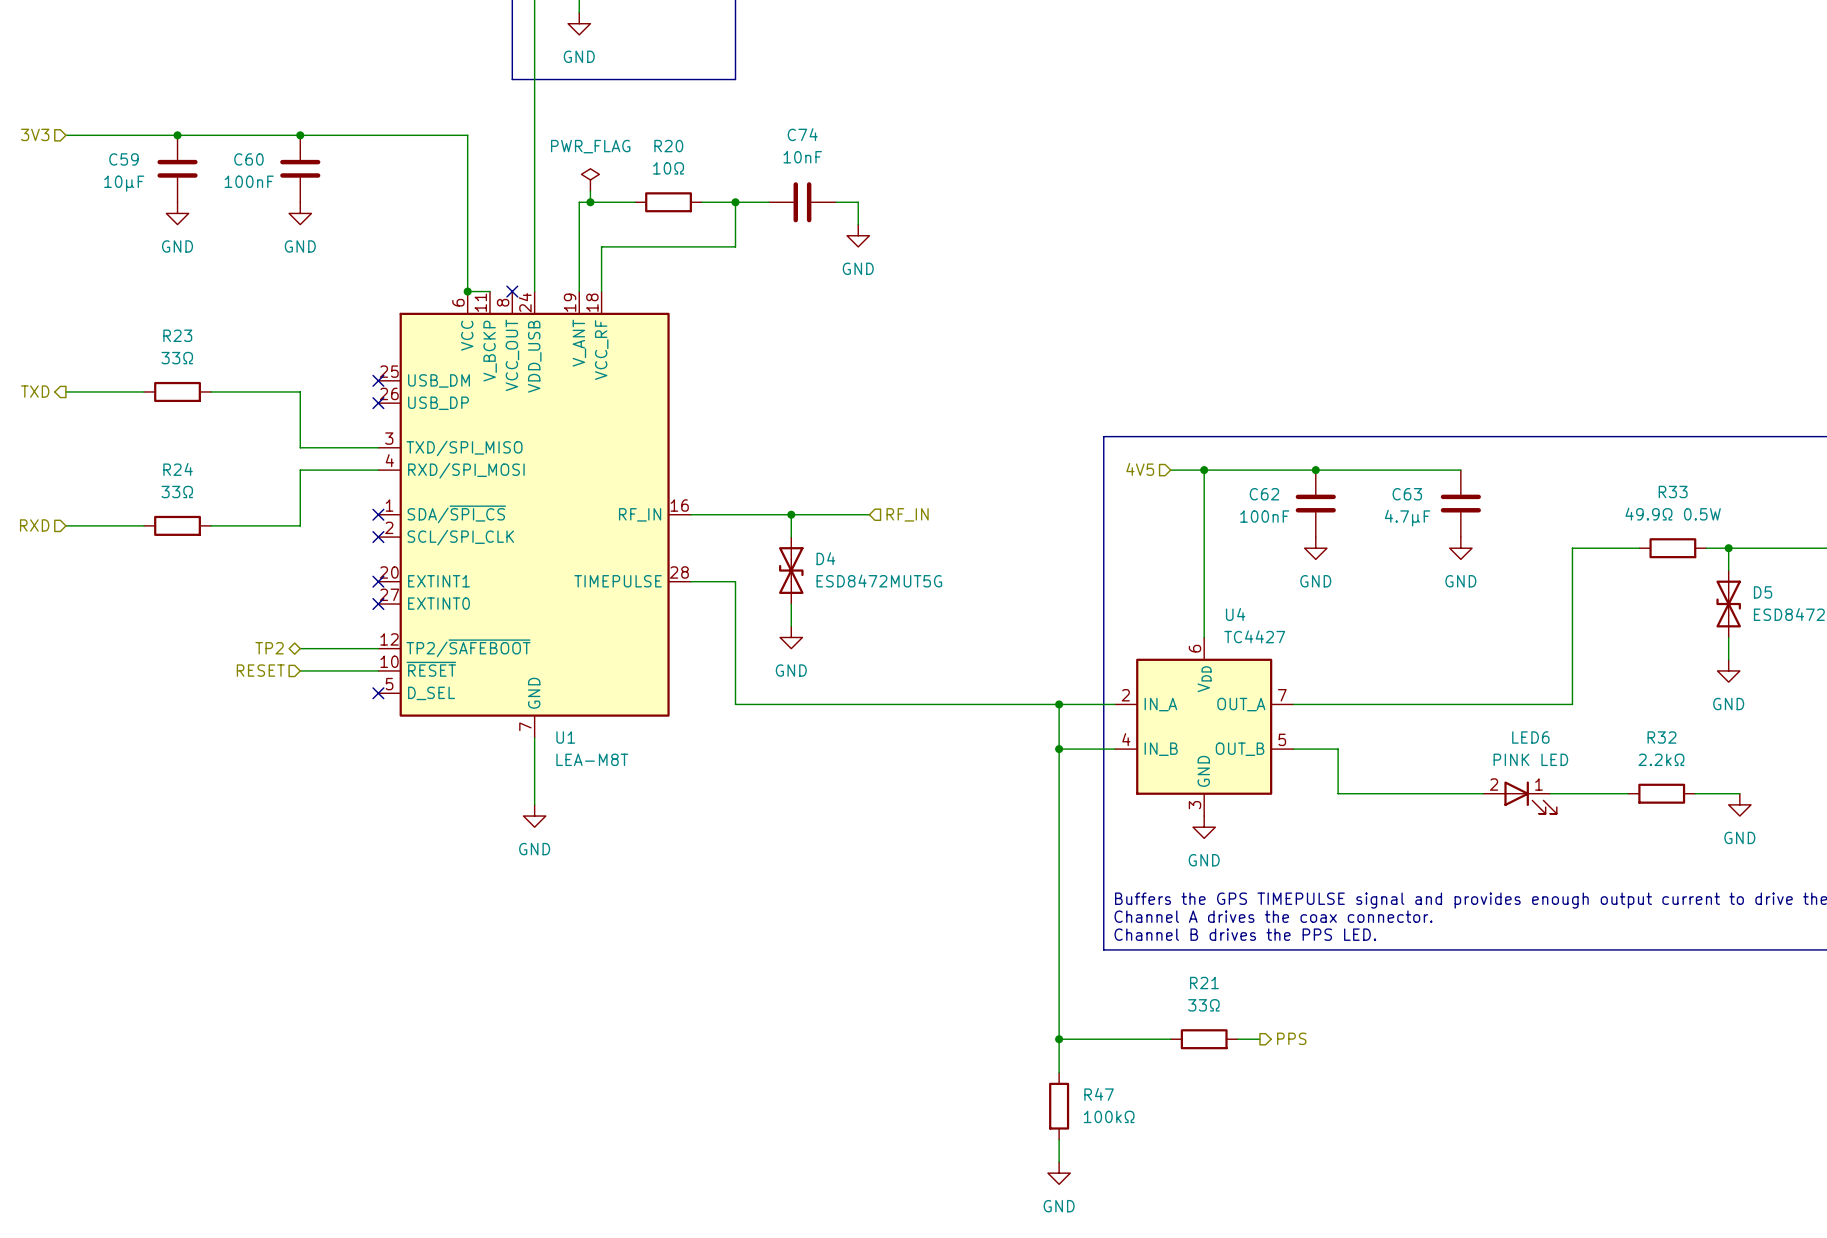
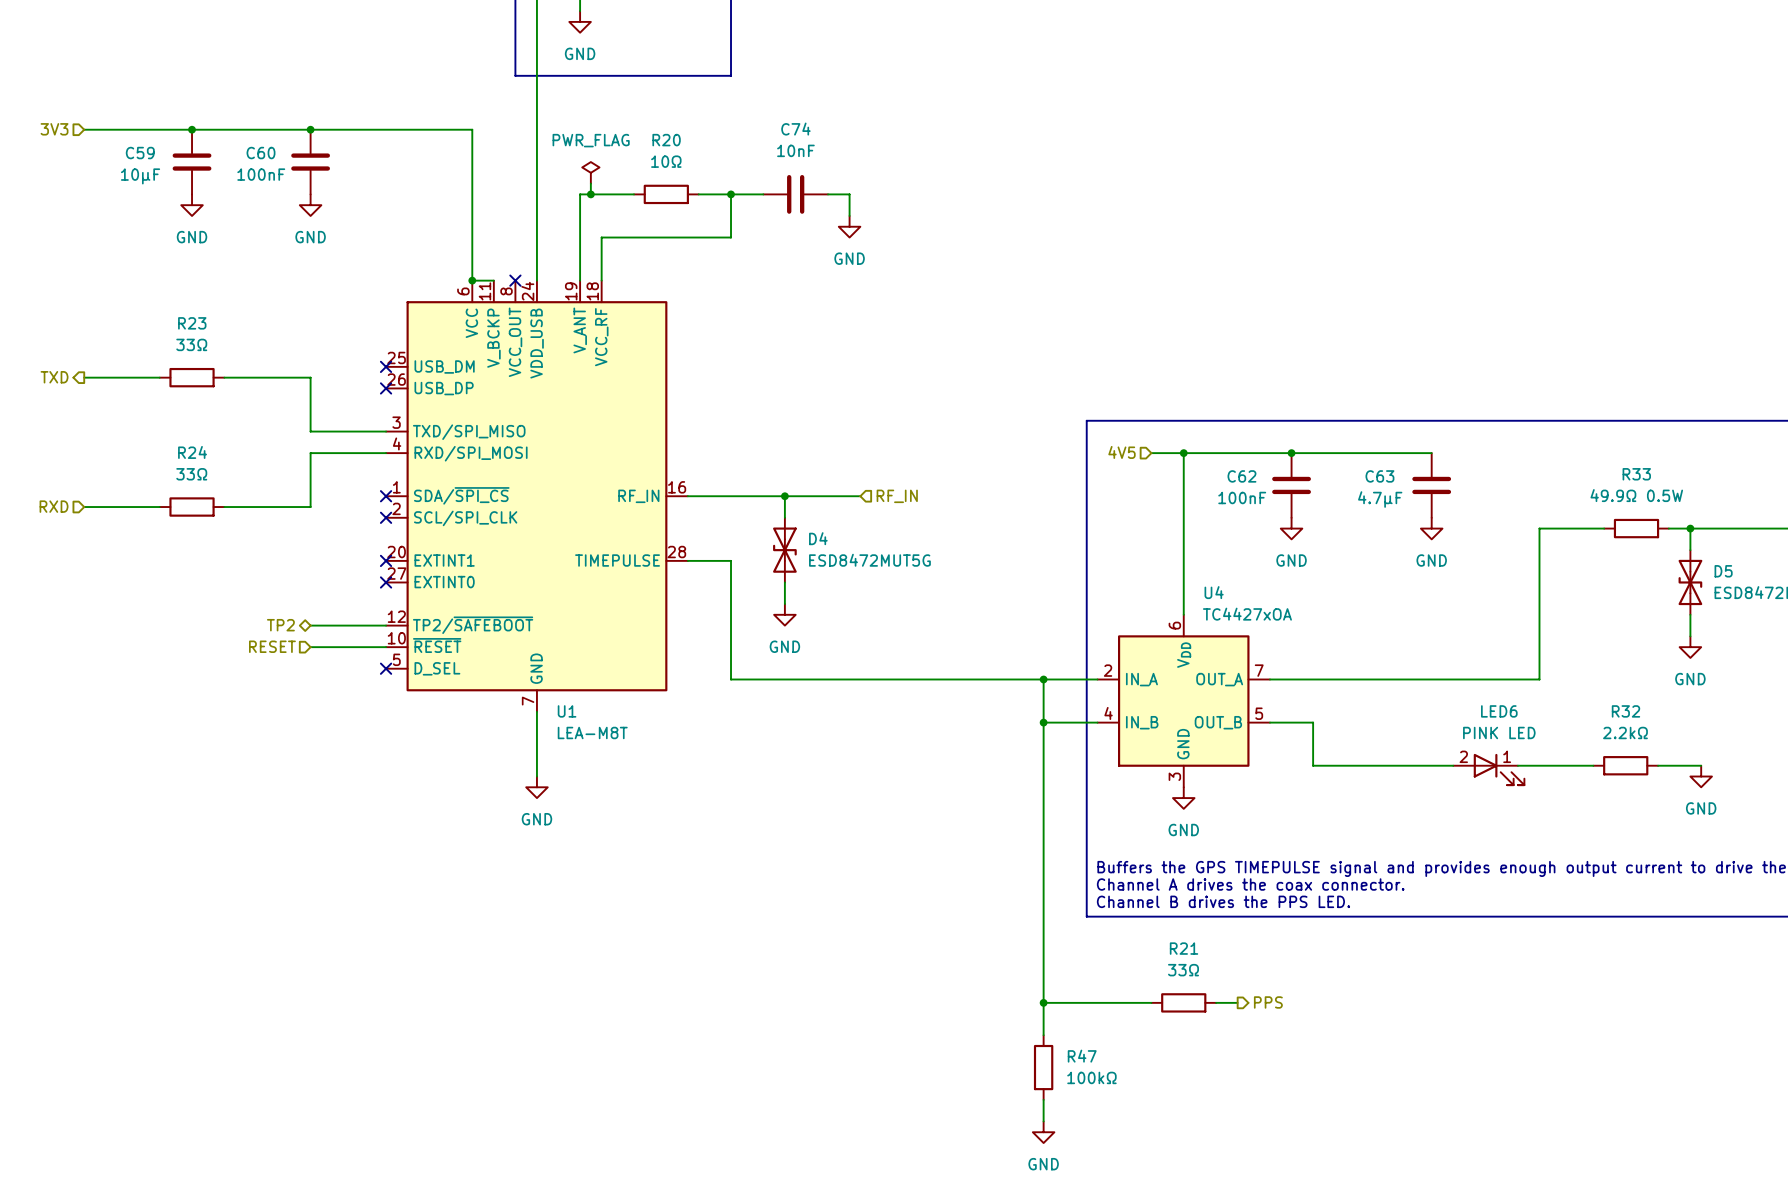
U4 value: TC4427 (1254, 636) -> TC4427xOA (1247, 614)

